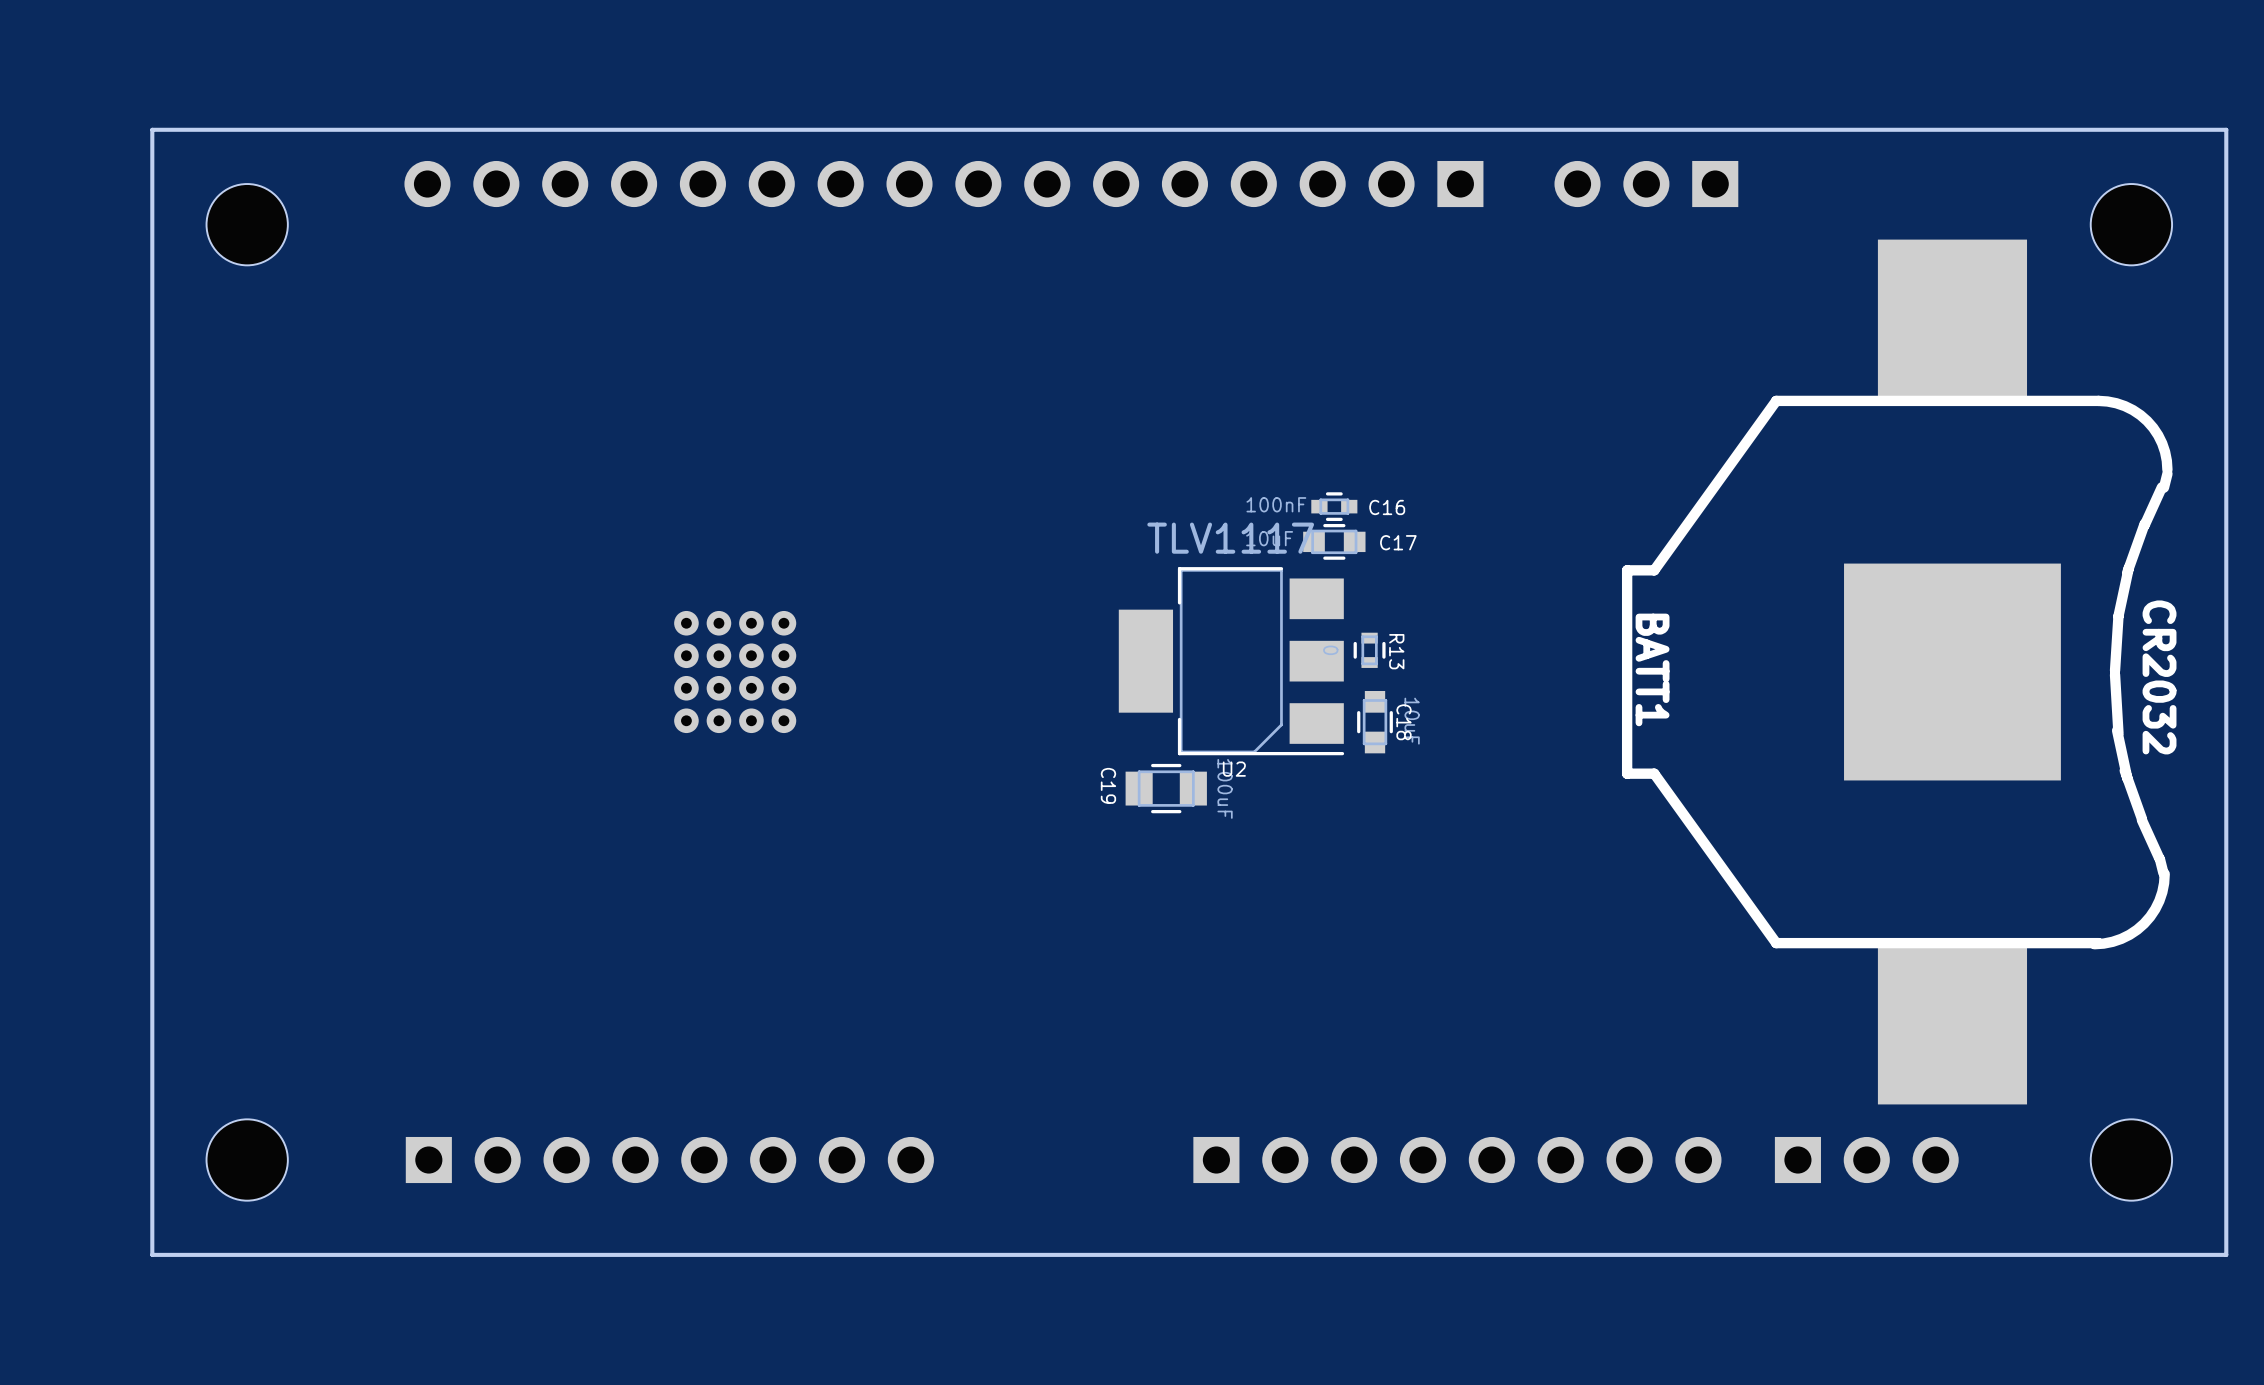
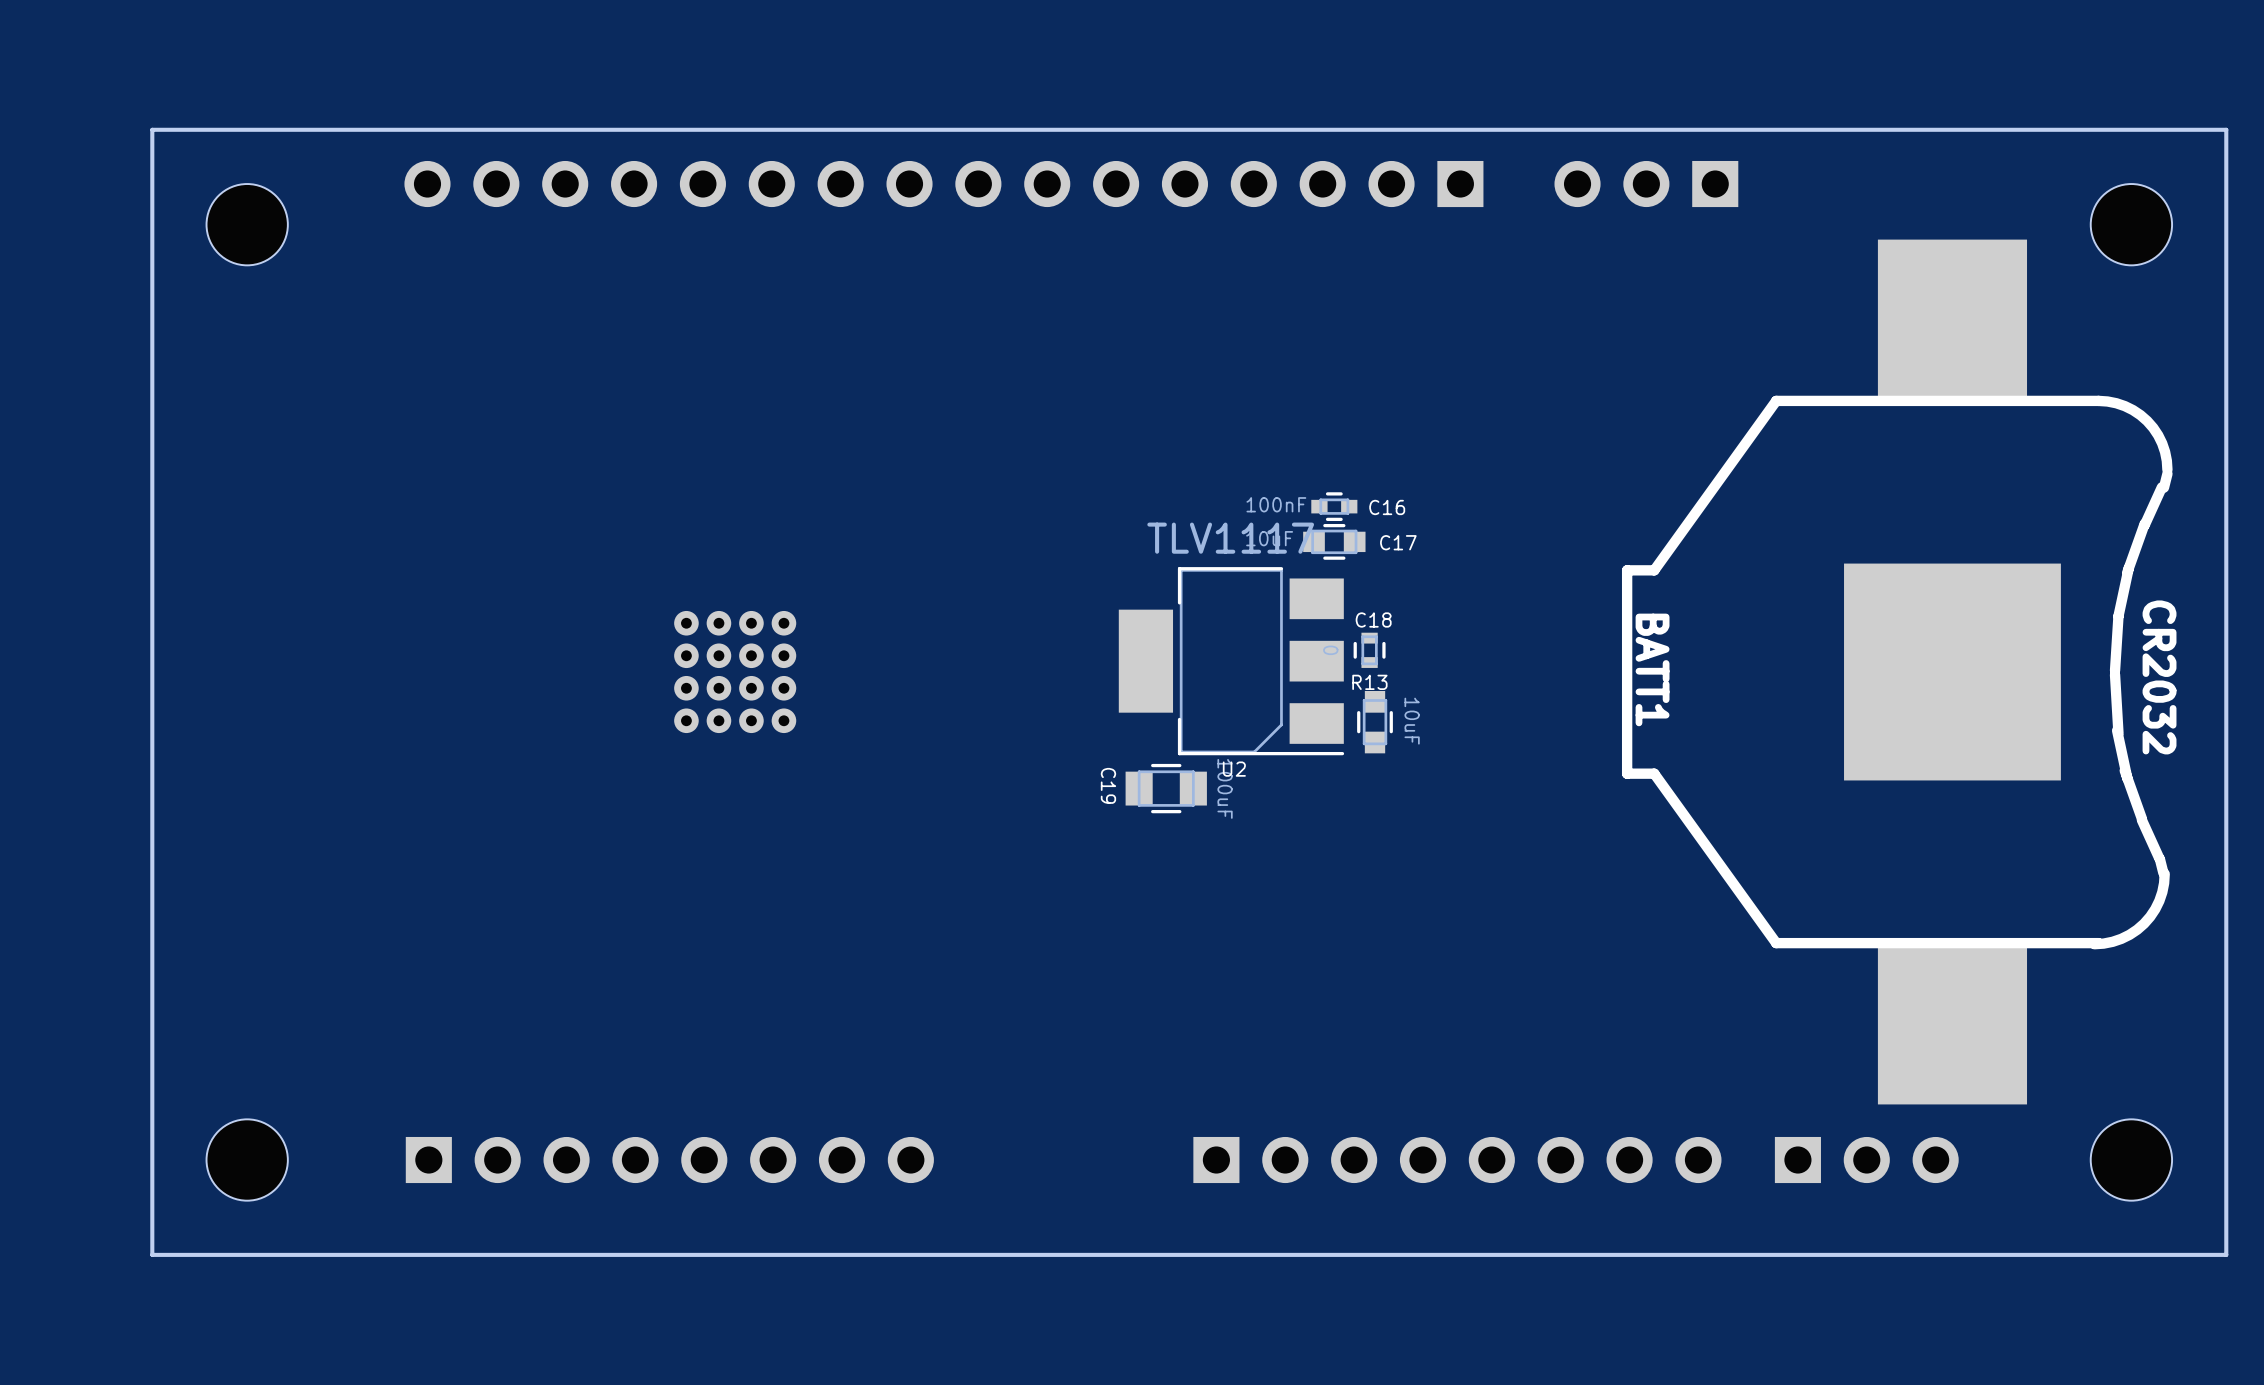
R13 name rotation: 0° (1396, 651) -> 90° counterclockwise (1369, 682)
C18 name rotation: 0° (1404, 722) -> 90° counterclockwise (1373, 619)
C18 name position: C18 (1404, 722) -> C18 (1373, 619)

